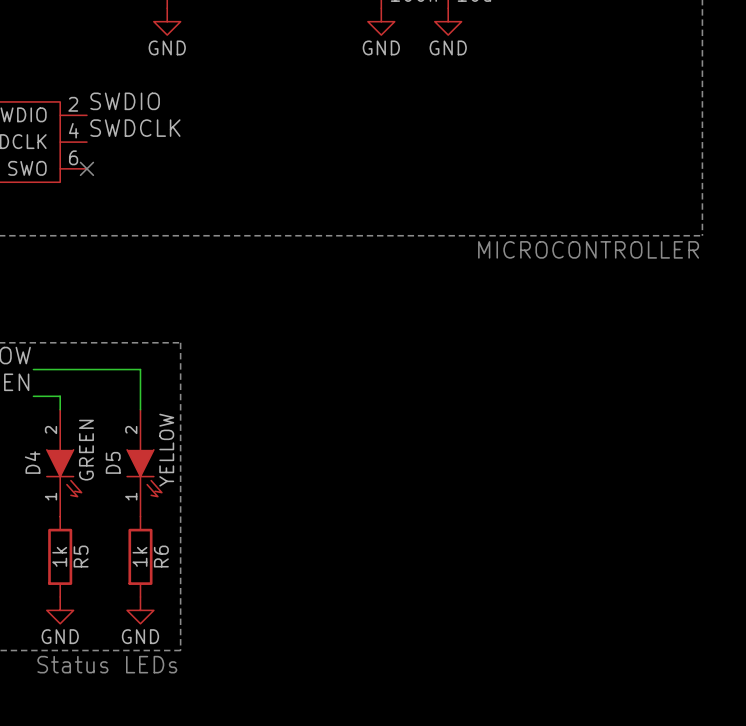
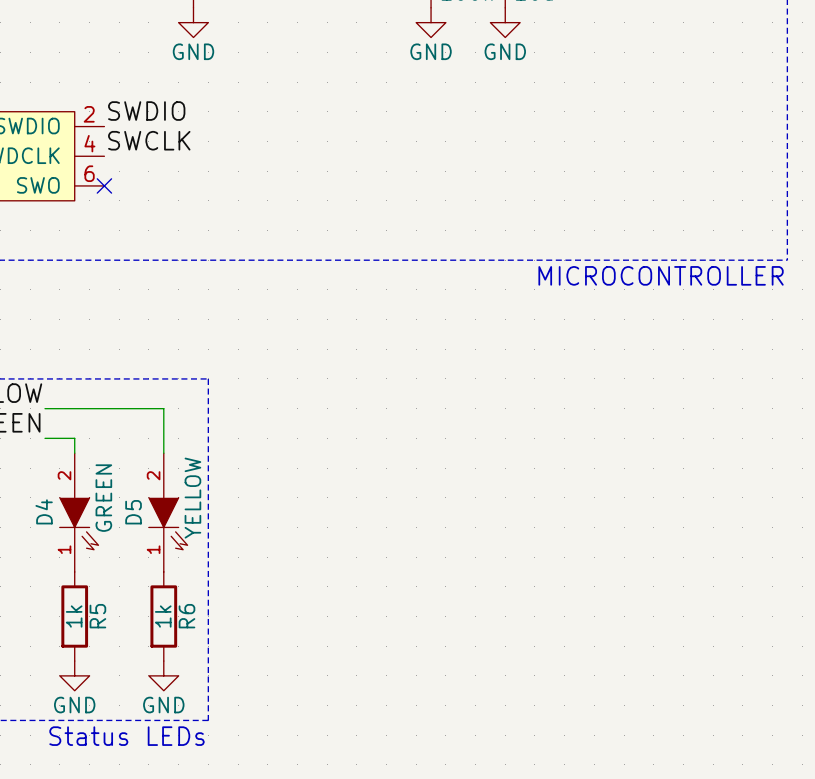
label: SWDCLK (135, 128) -> SWCLK (149, 140)

